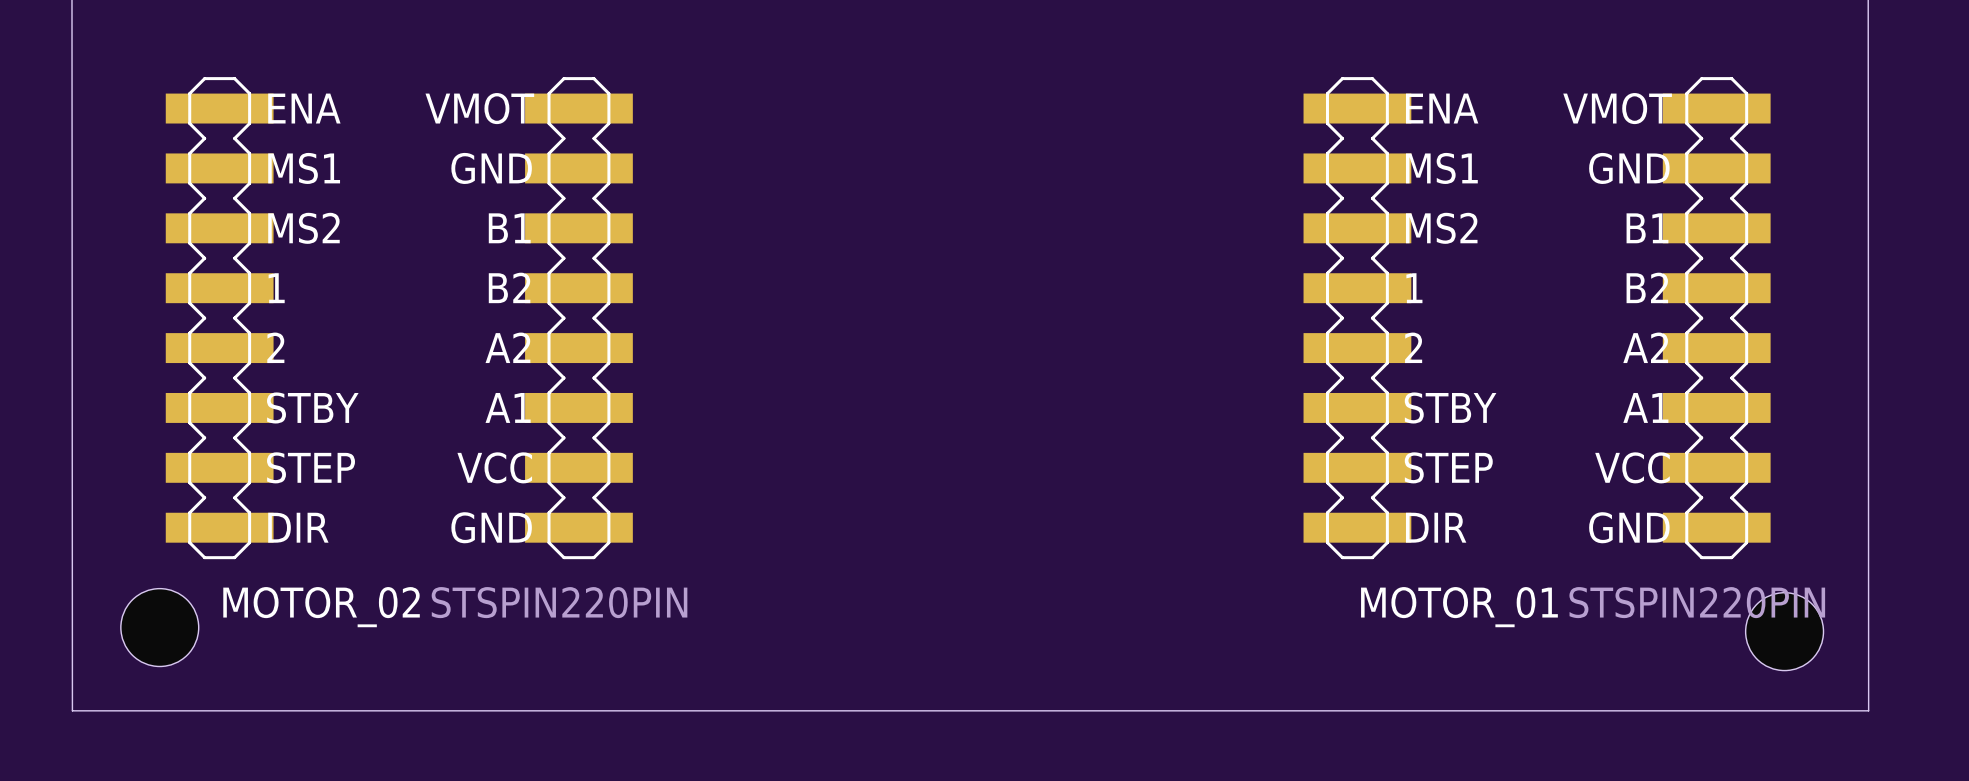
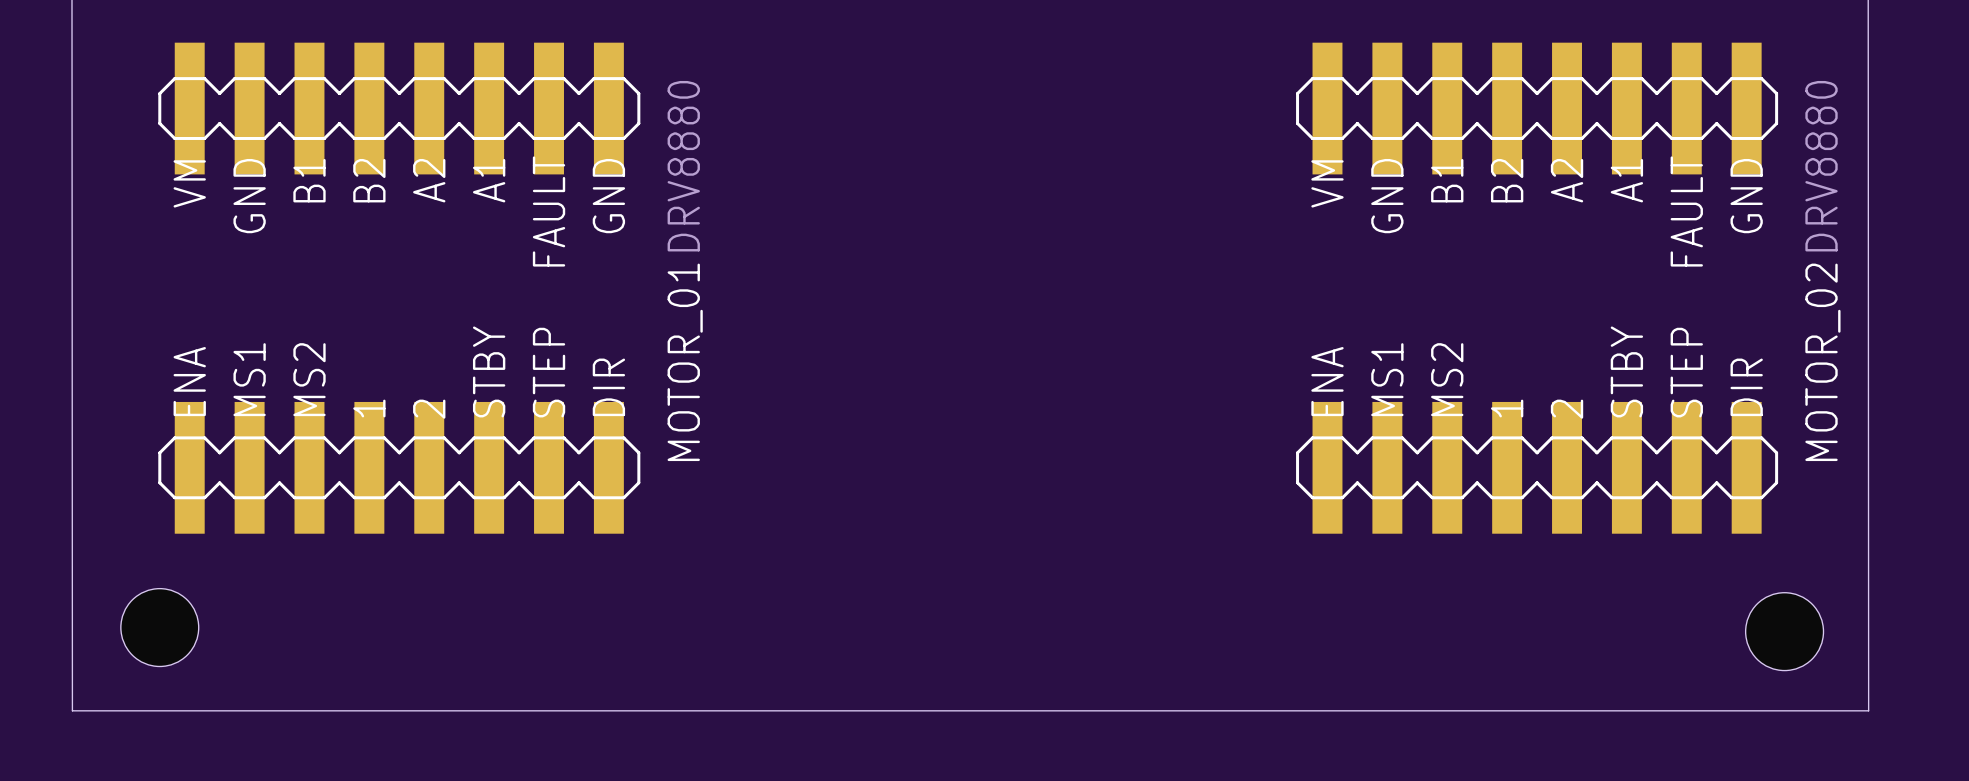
MOTOR_02 footprint: [165, 77, 633, 560] -> [1296, 42, 1779, 534]
MOTOR_01 footprint: [1303, 77, 1771, 560] -> [158, 42, 641, 534]
MOTOR_02 value: STSPIN220PIN (559, 602) -> DRV8880 (1821, 166)
MOTOR_01 value: STSPIN220PIN (1697, 602) -> DRV8880 (683, 166)
MOTOR_02 name position: MOTOR_02 (321, 607) -> MOTOR_02 (1822, 362)
MOTOR_01 name position: MOTOR_01 (1459, 607) -> MOTOR_01 (685, 362)

